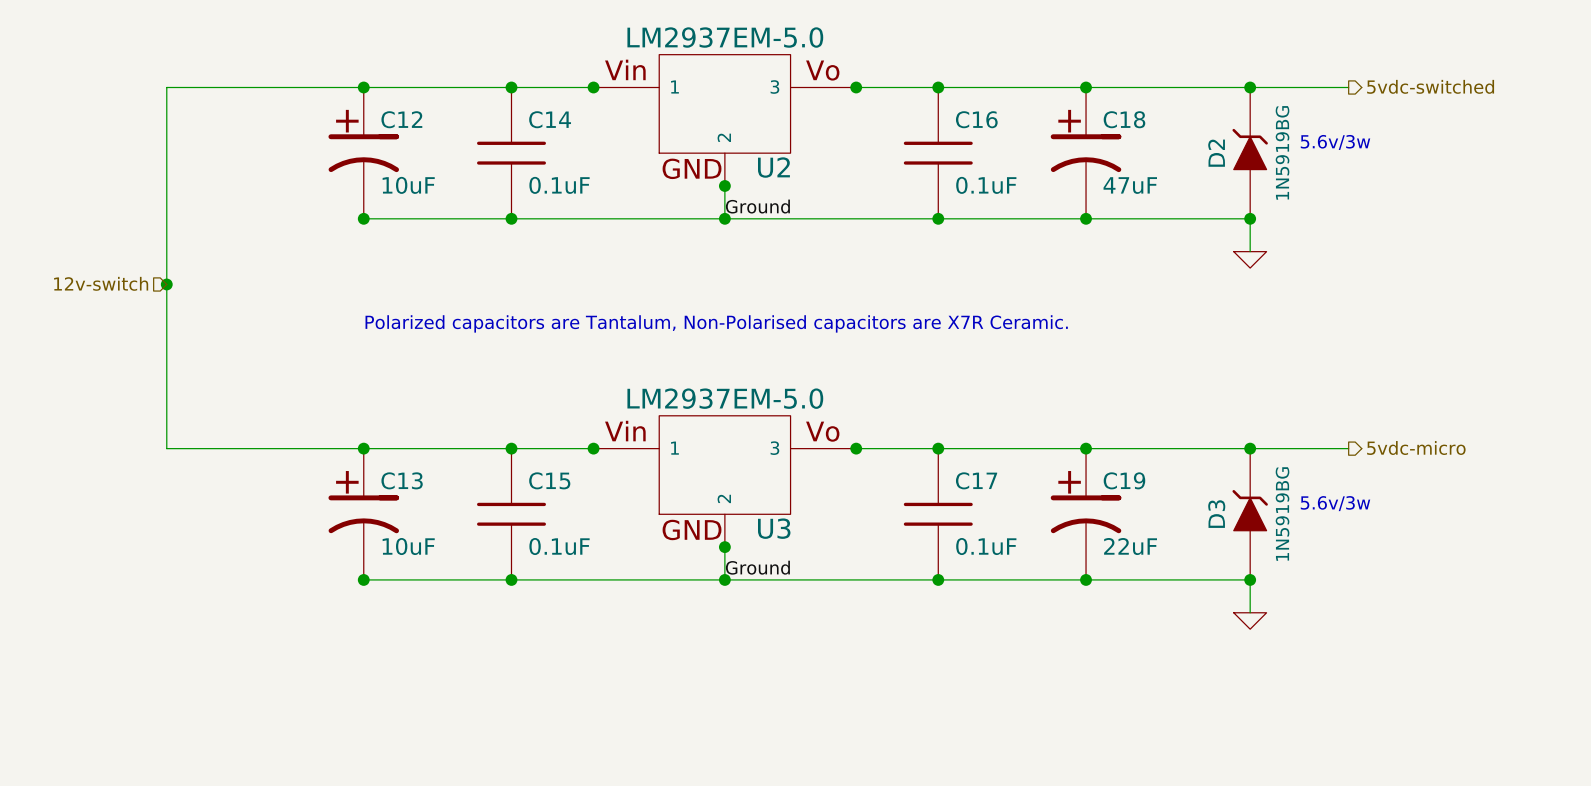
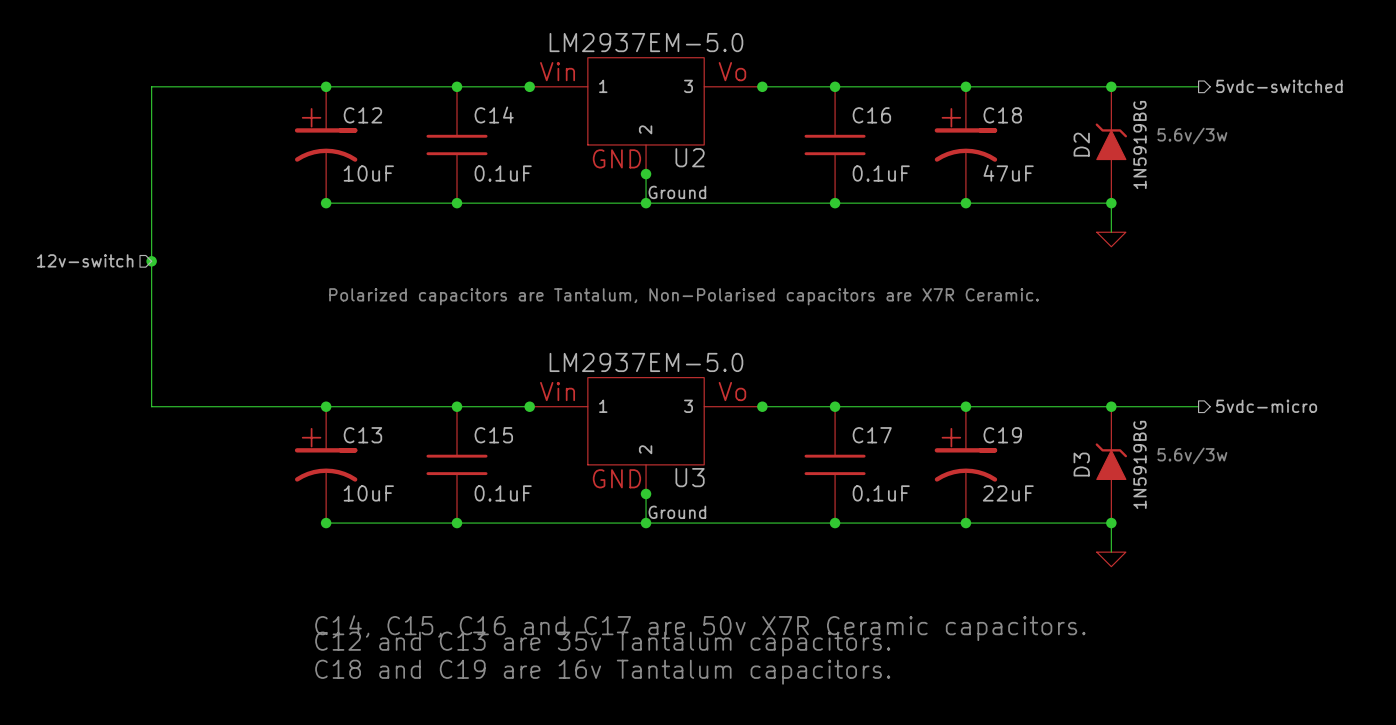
text: none -> C14, C15, C16 and C17 are 50v X7R Ceramic capacitors. (700, 628)
text: none -> C12 and C13 are 35v Tantalum capacitors. (602, 644)
text: none -> C18 and C19 are 16v Tantalum capacitors. (602, 672)

